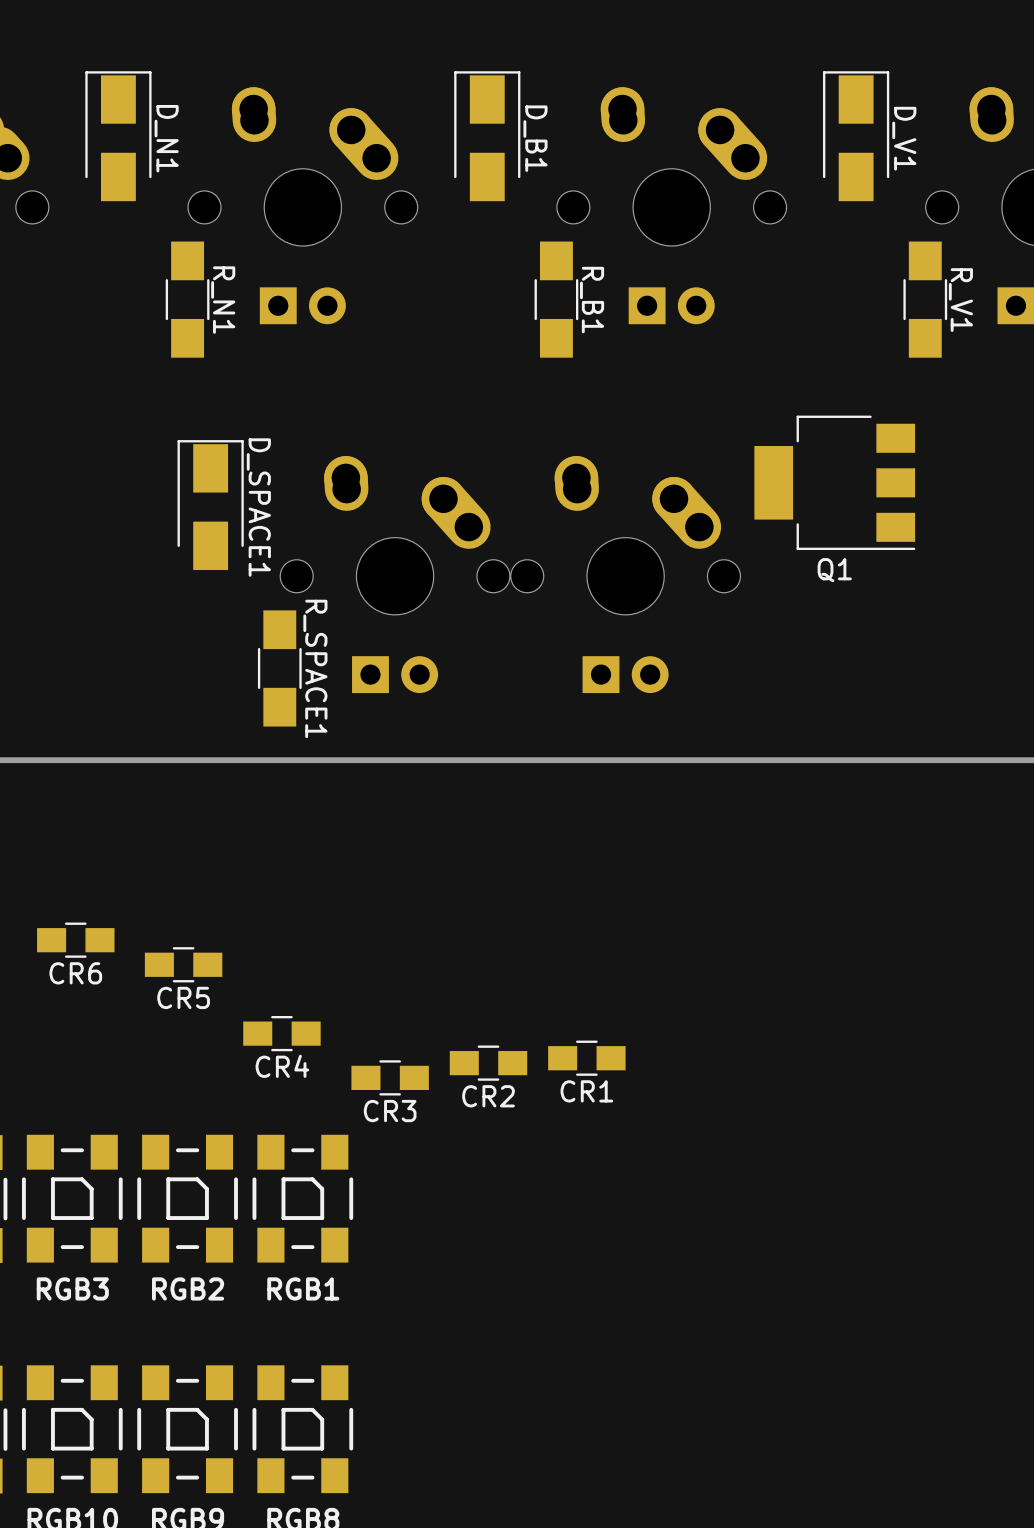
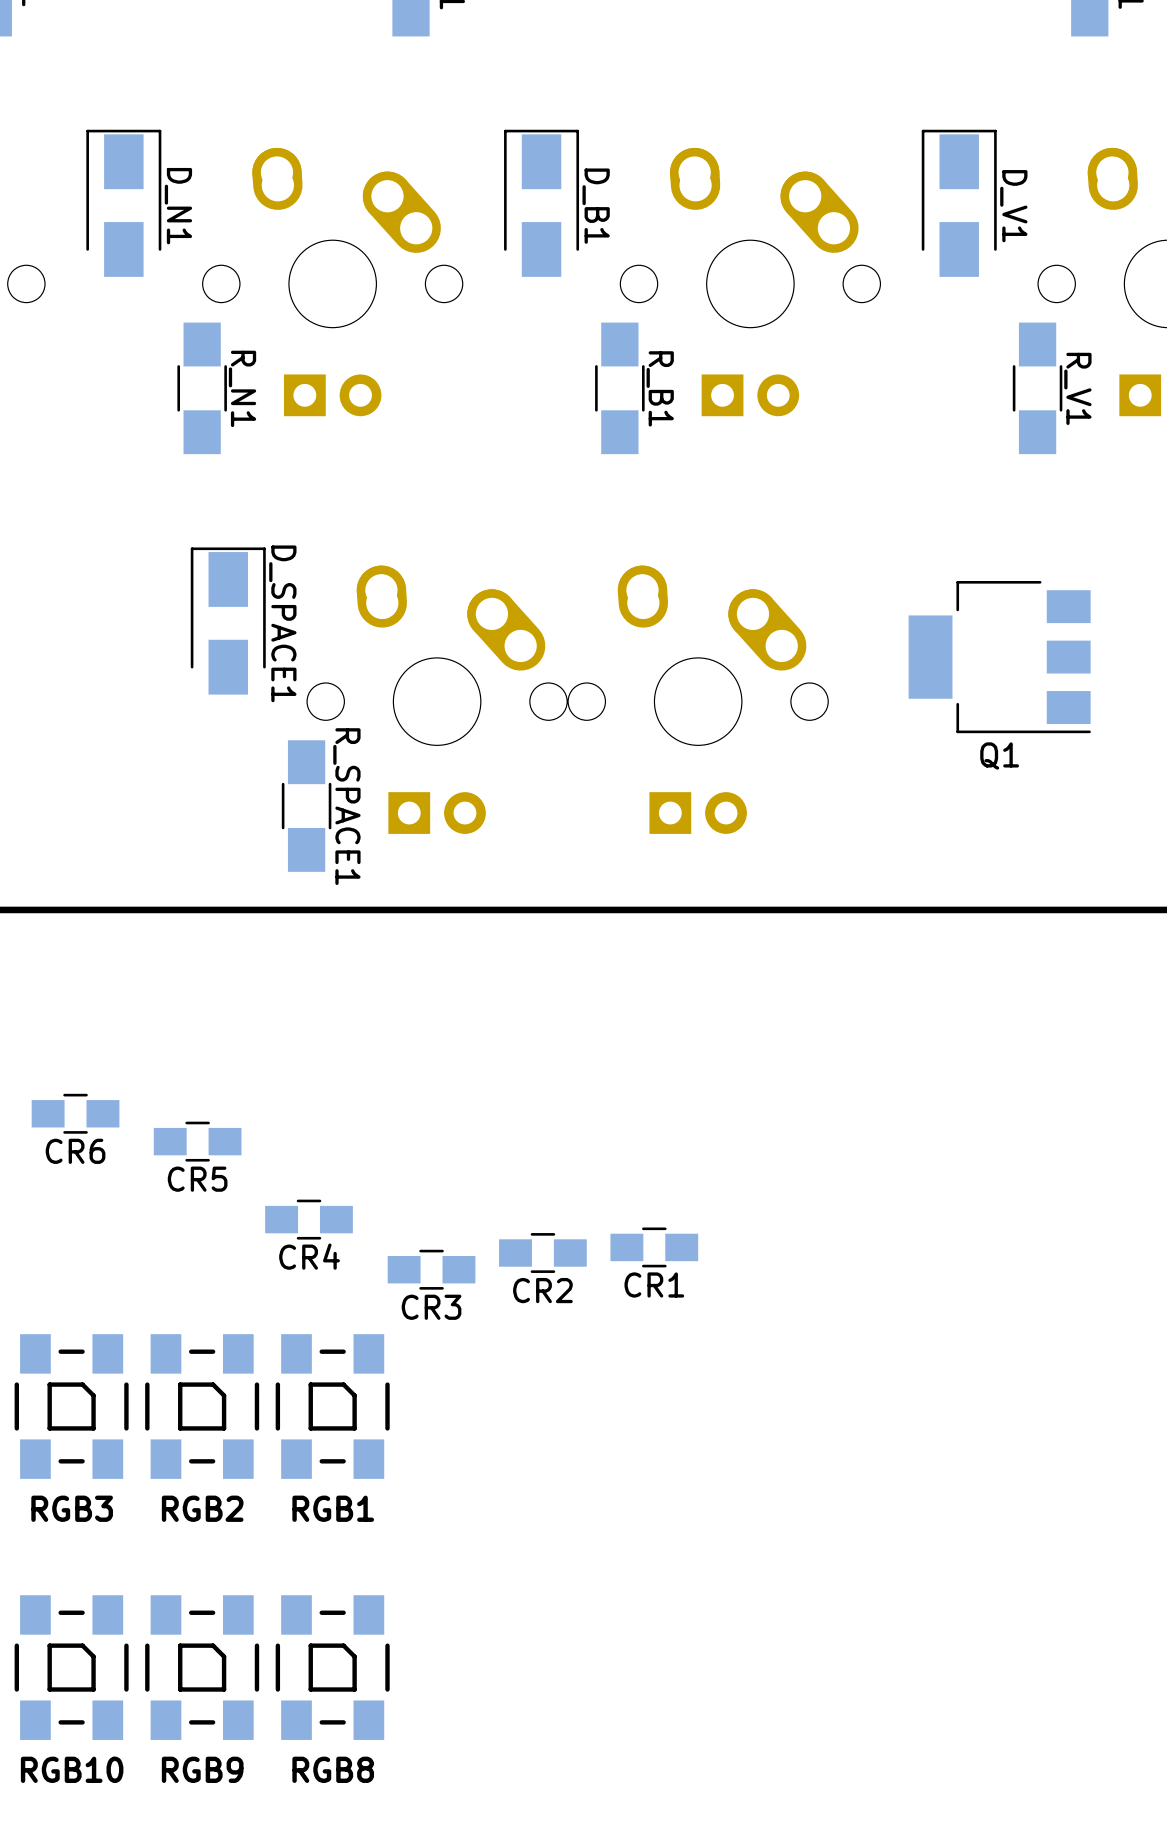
Q1 position: (834, 482) -> (999, 657)

